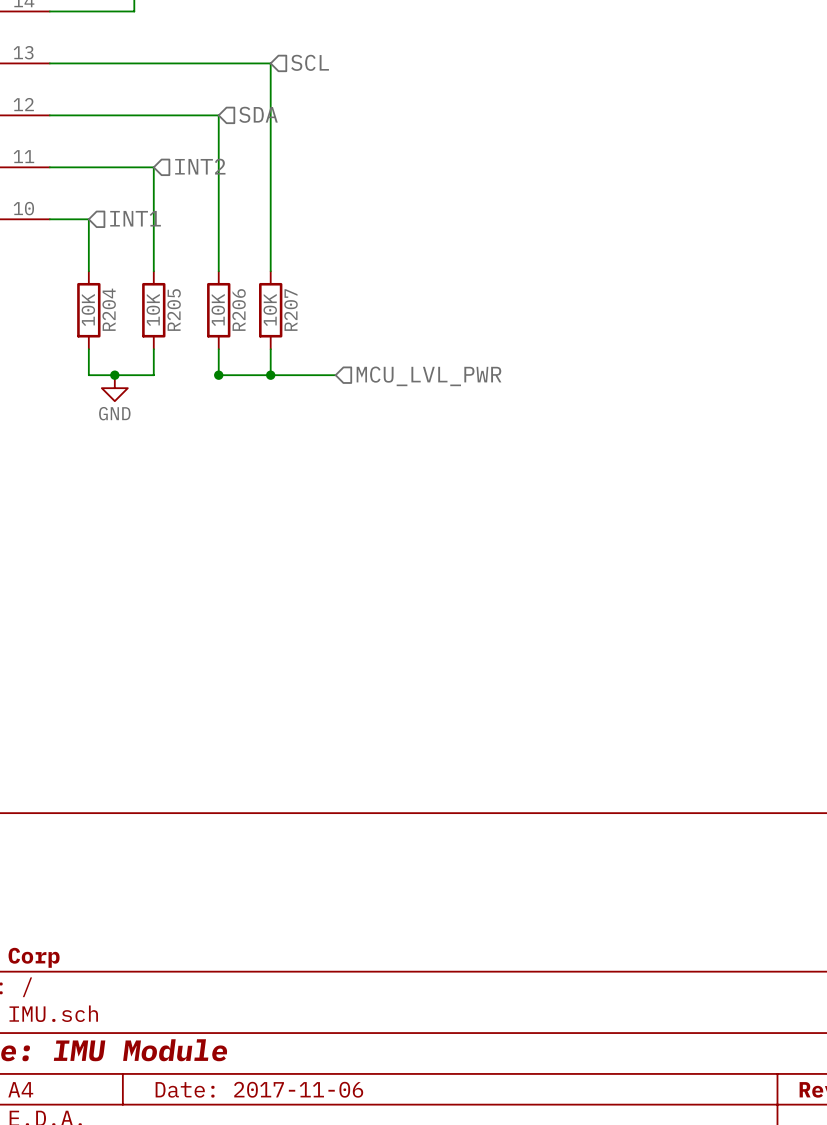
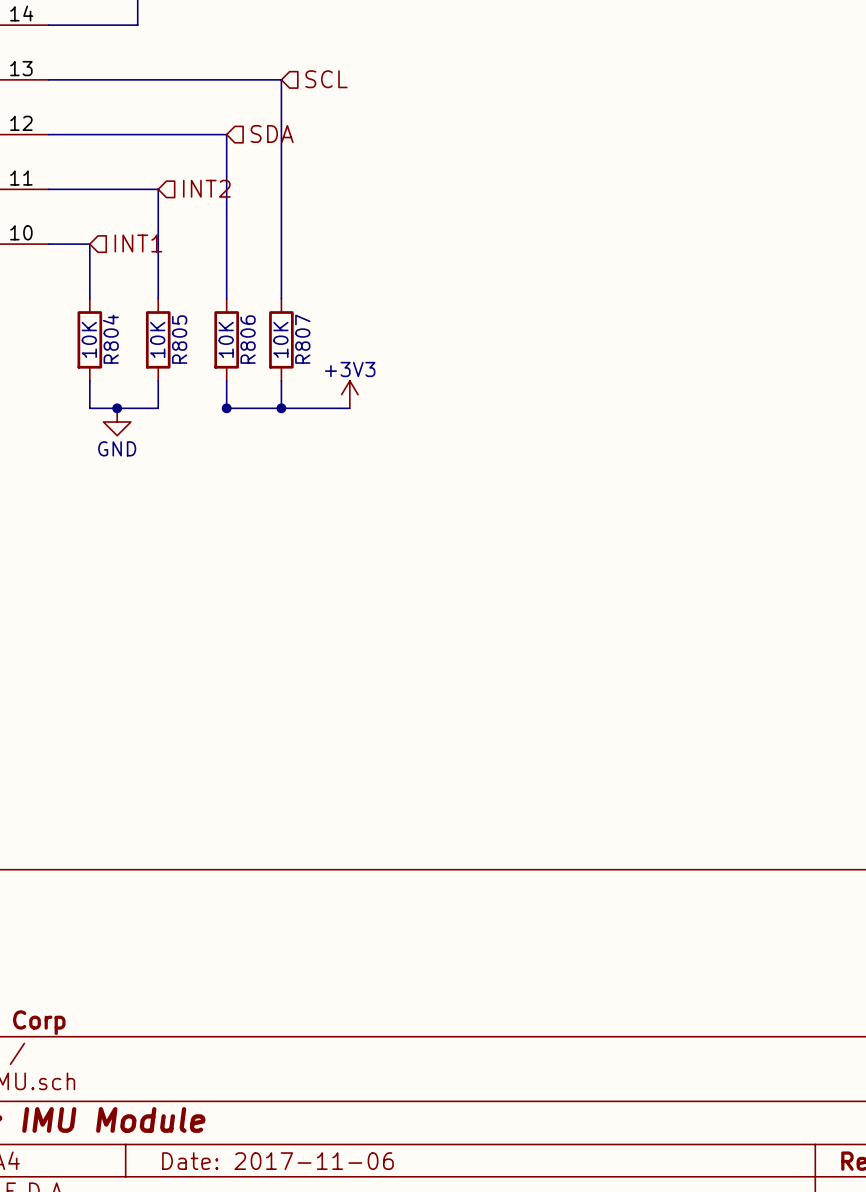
R204 name: R204 (109, 309) -> R804 (110, 339)
R206 name: R206 (239, 309) -> R806 (248, 339)
R205 name: R205 (174, 310) -> R805 (179, 339)
R207 name: R207 (291, 310) -> R807 (302, 339)
power symbol: none -> +3V3 (349, 394)
hierarchical label: MCU_LVL_PWR (429, 376) -> none

